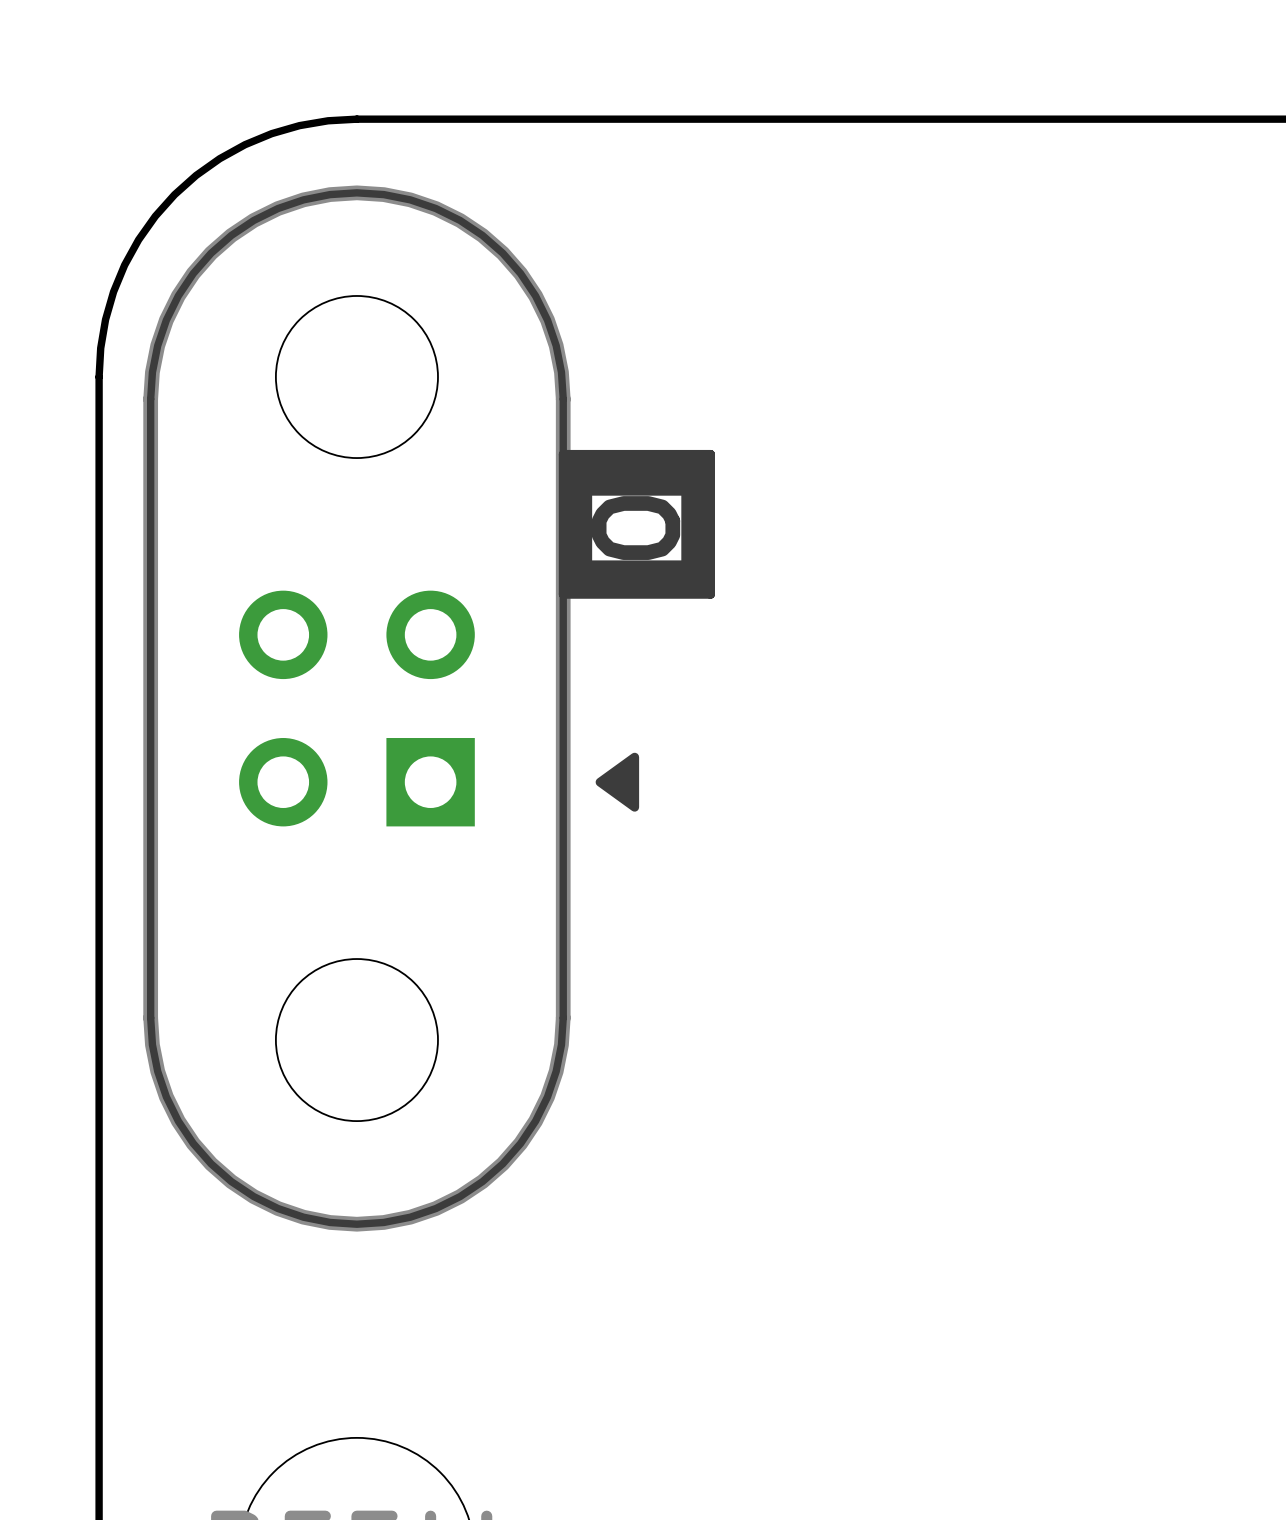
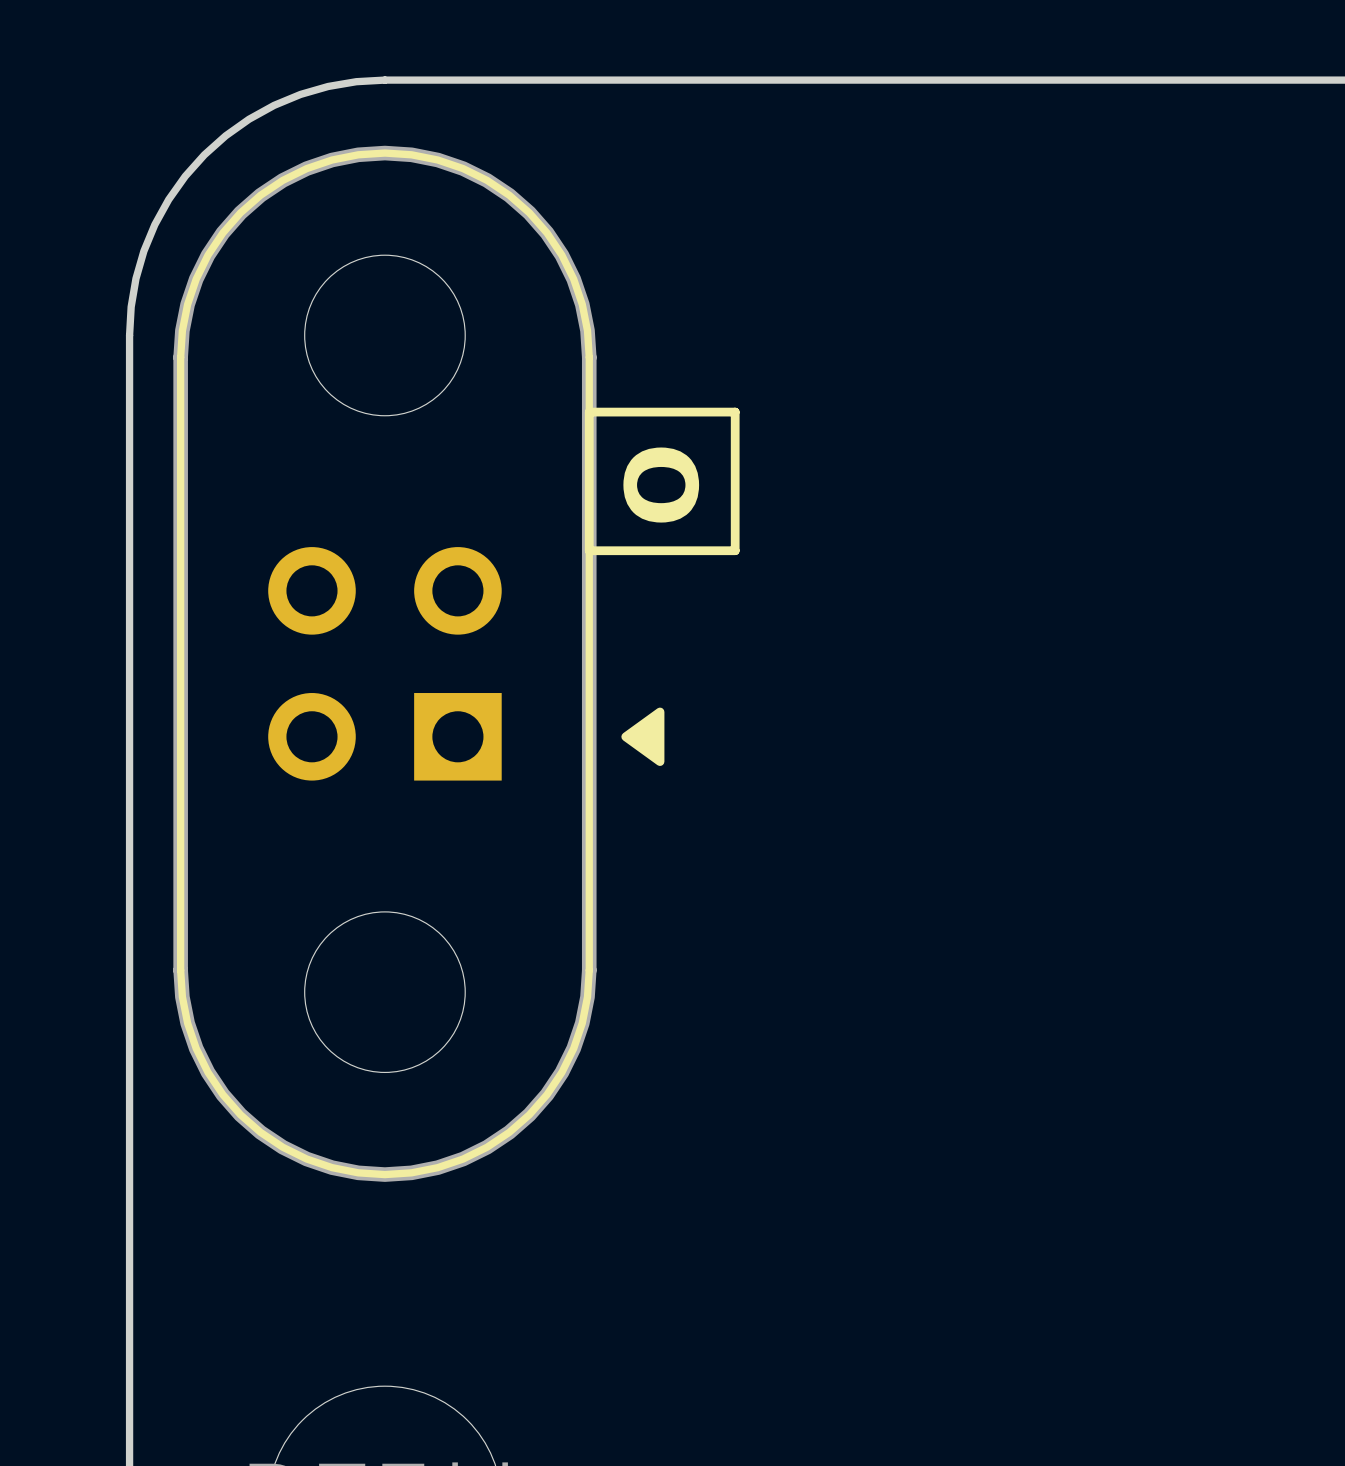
drawing: [563, 454, 711, 595] -> none

